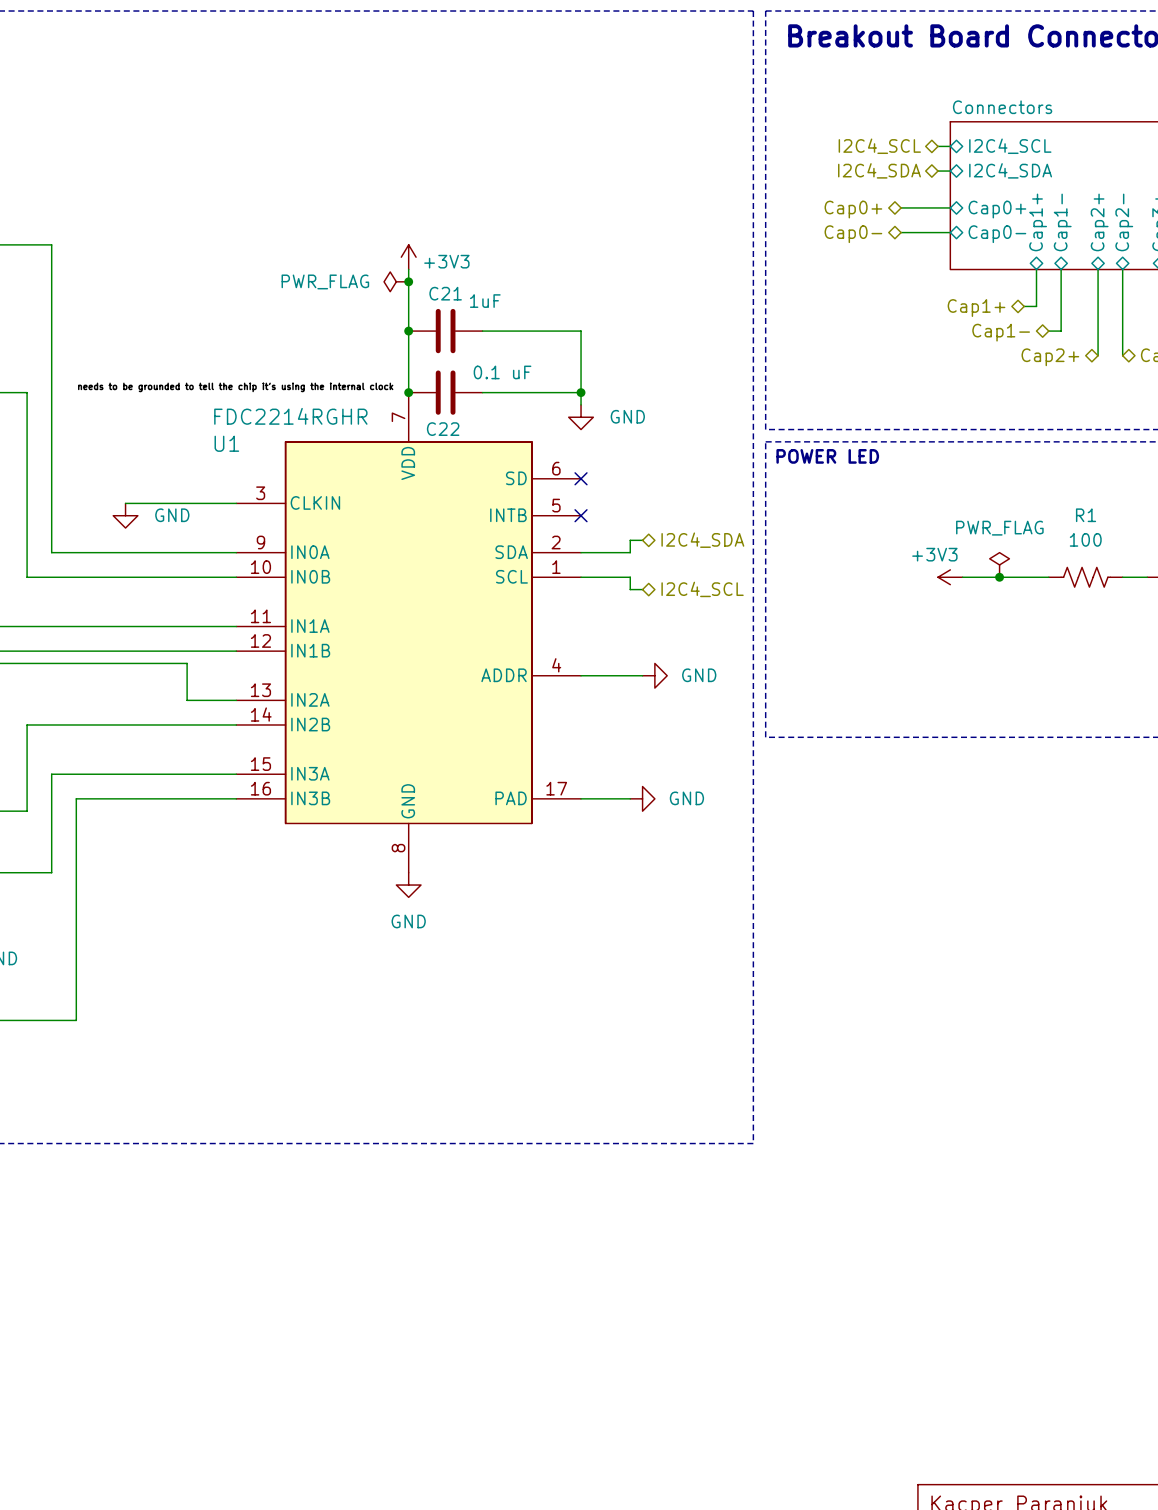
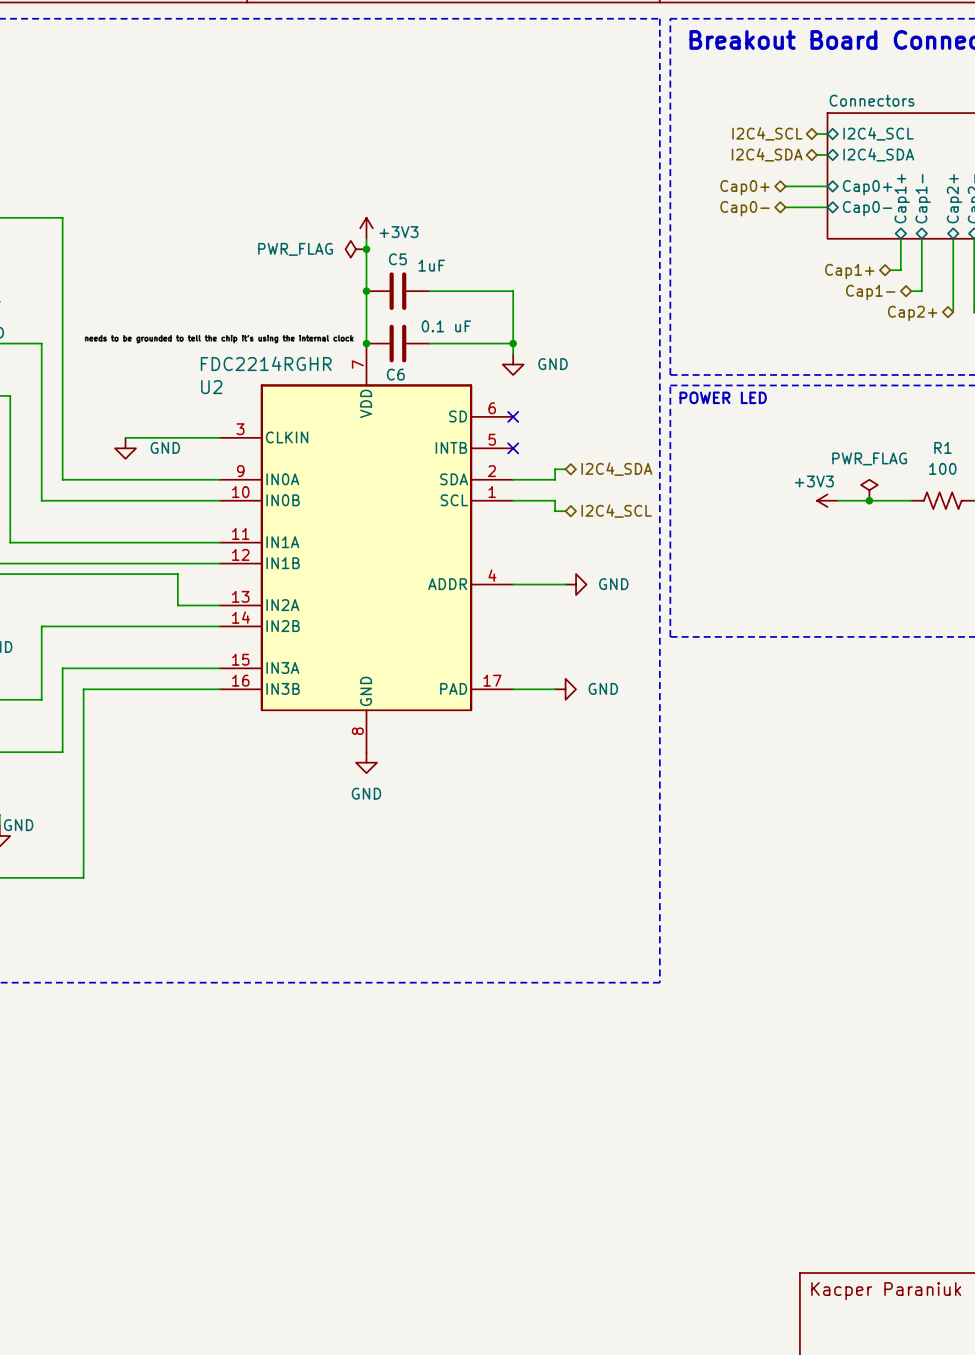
C21 name: C21 (445, 293) -> C5 (397, 259)
C22 name: C22 (443, 429) -> C6 (395, 374)
U1 name: U1 (226, 443) -> U2 (211, 387)

